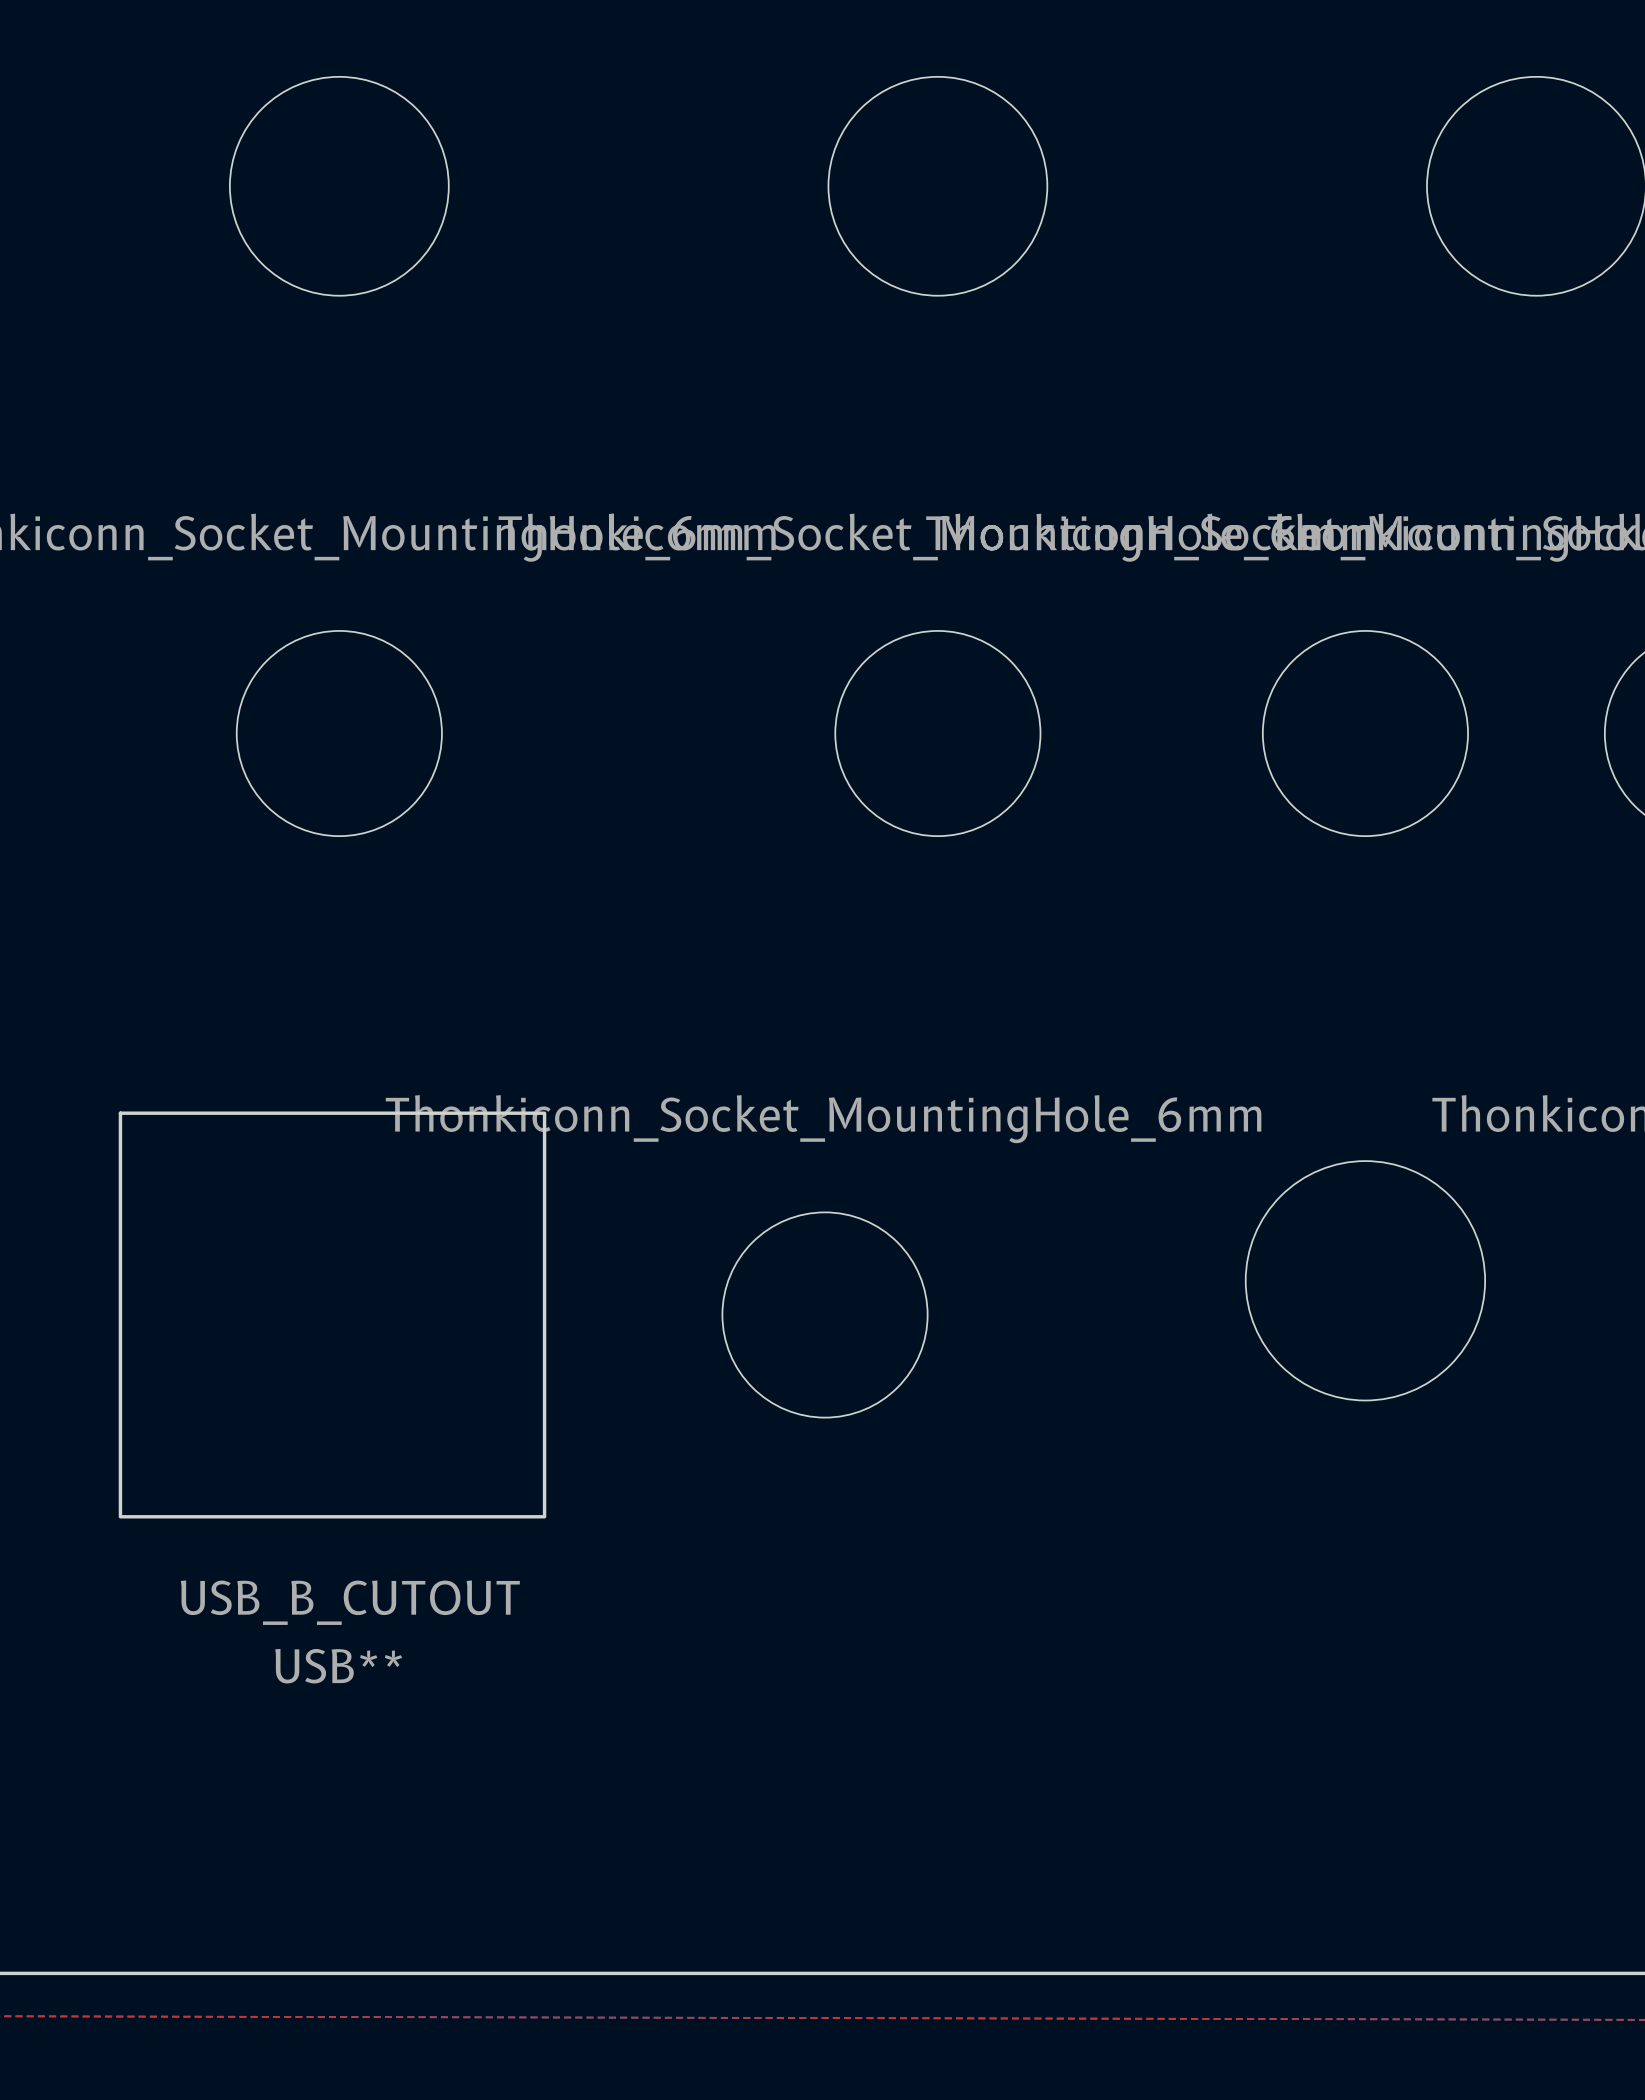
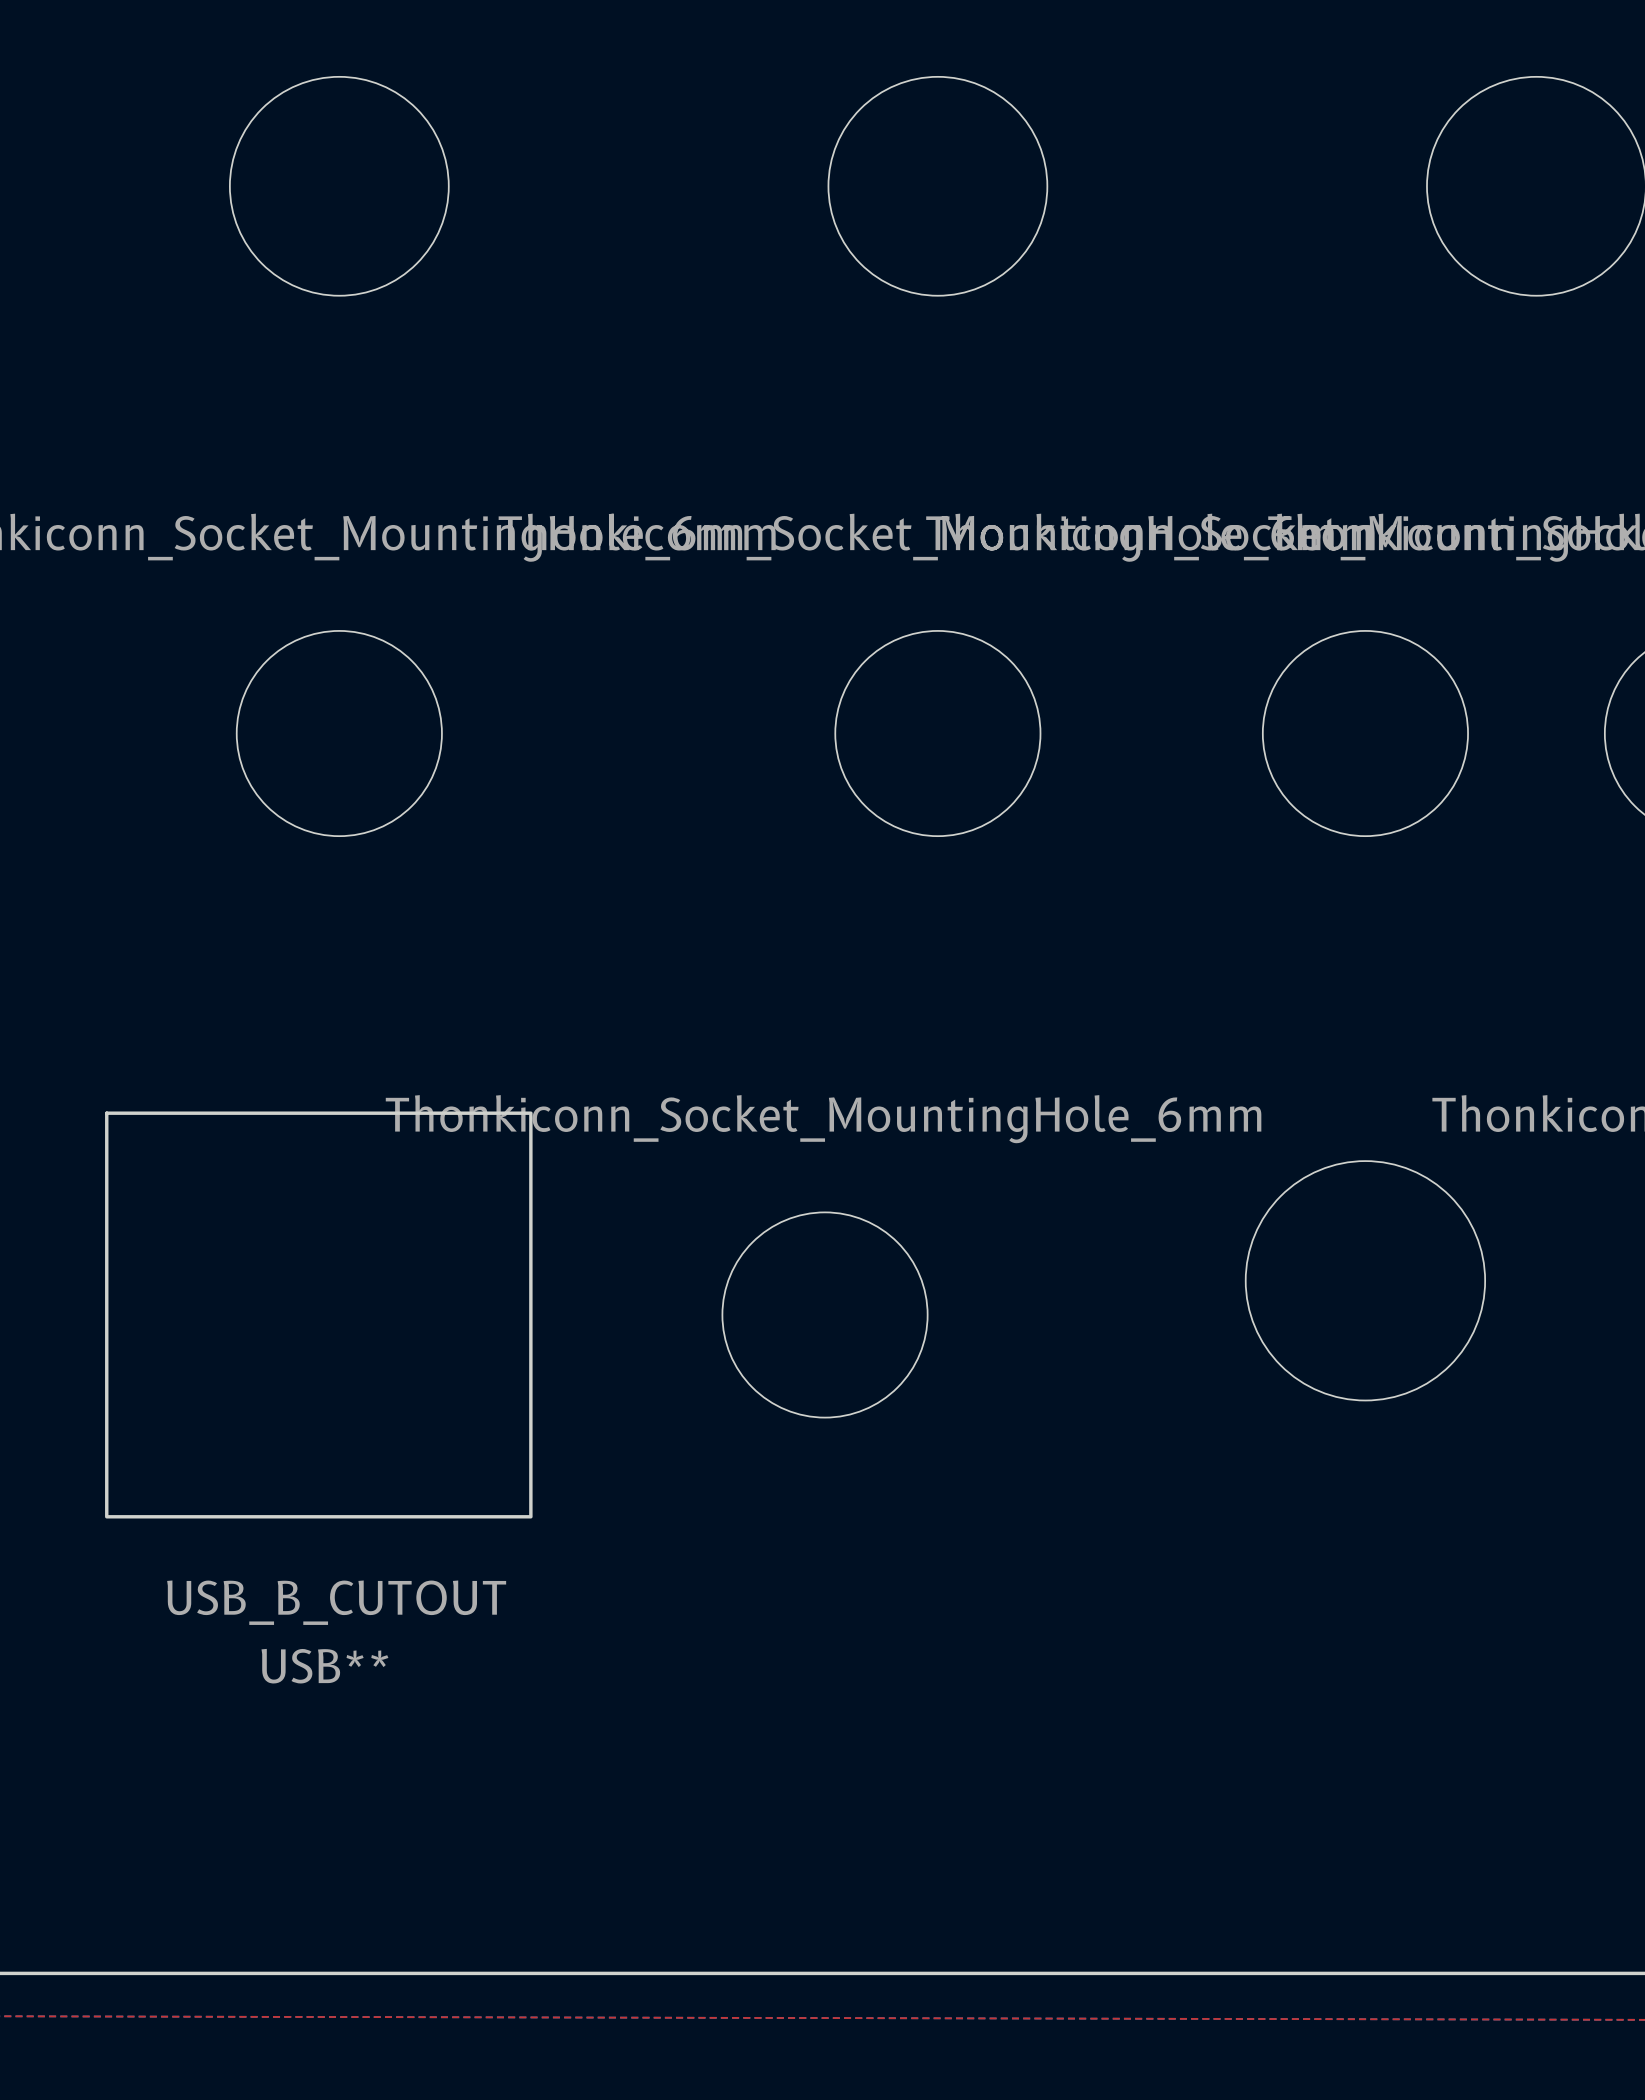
USB** position: (332, 1314) -> (318, 1314)

